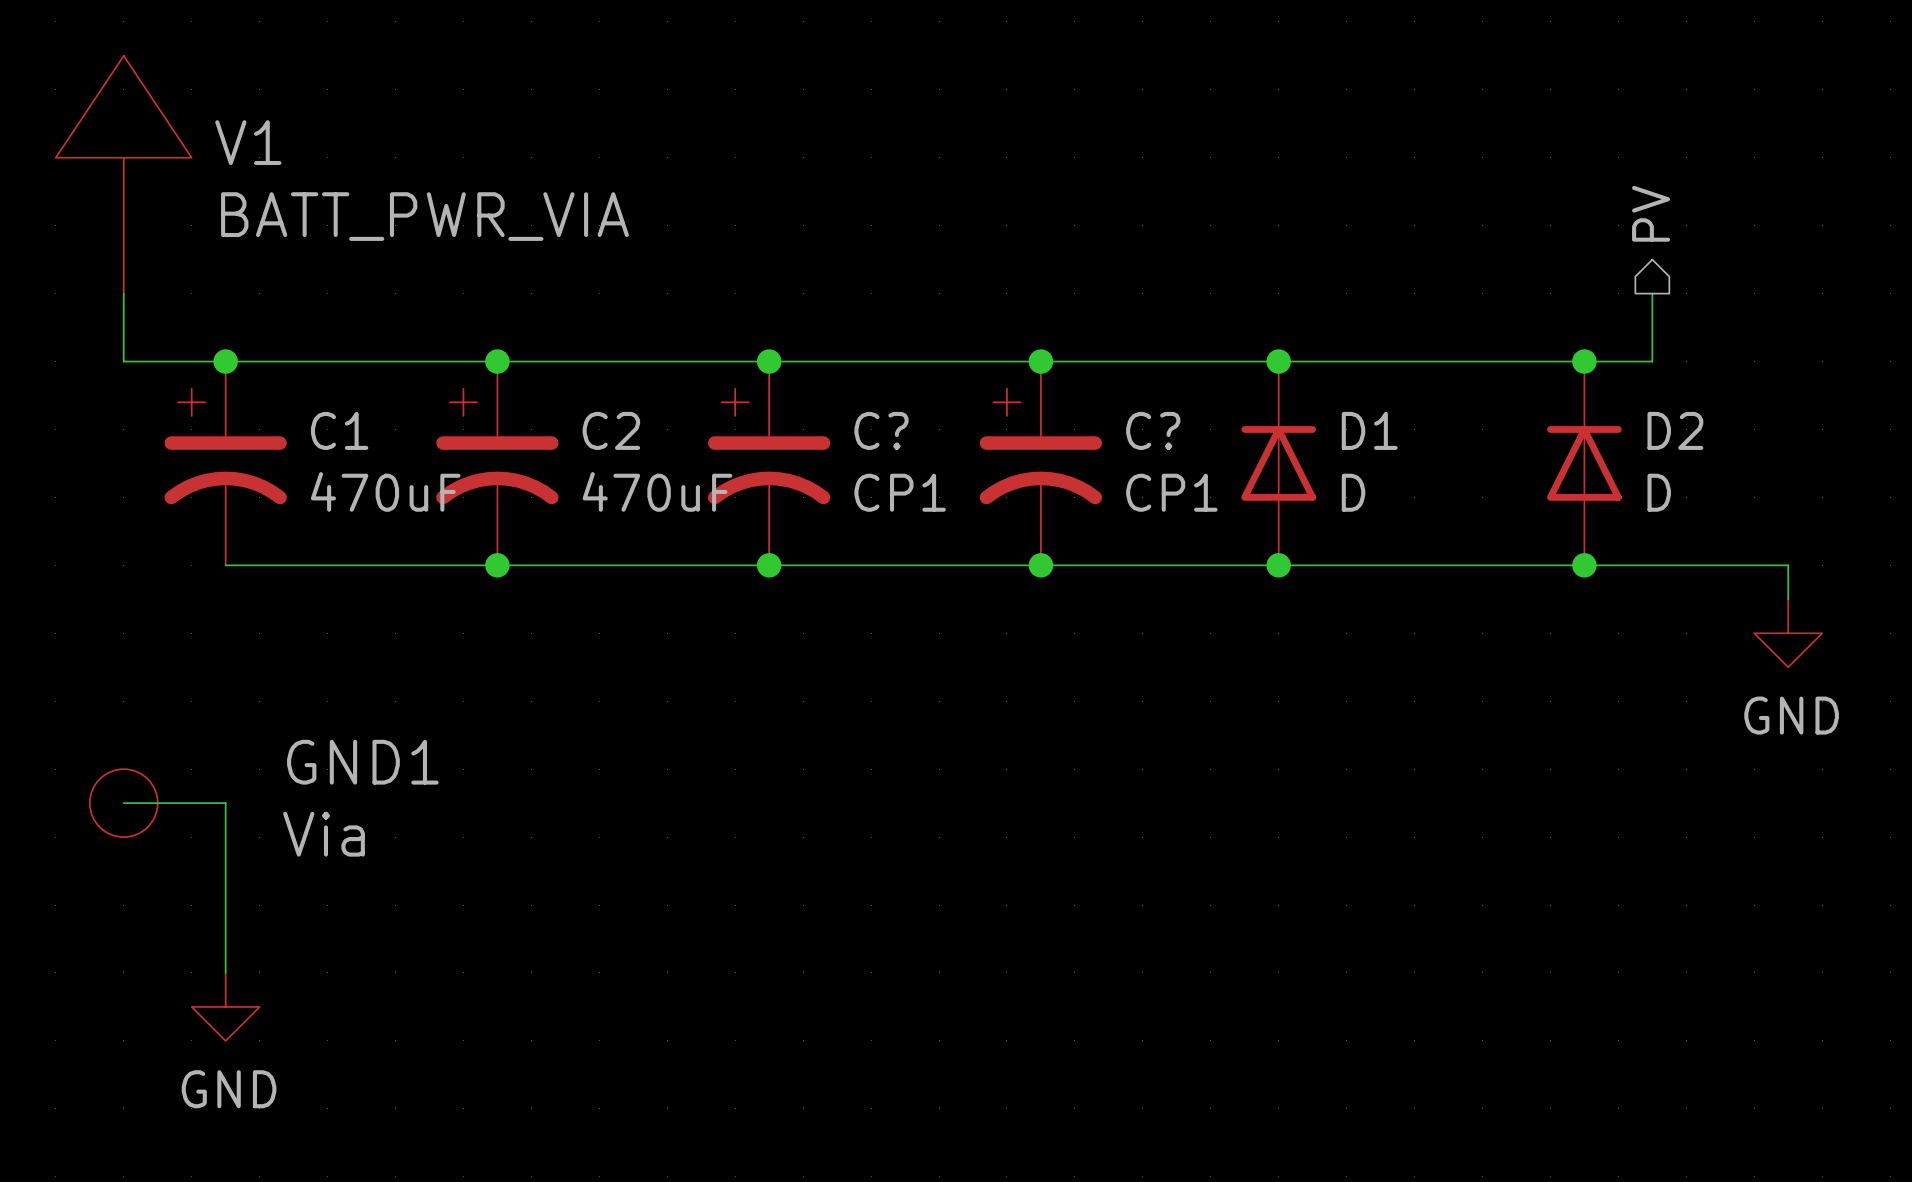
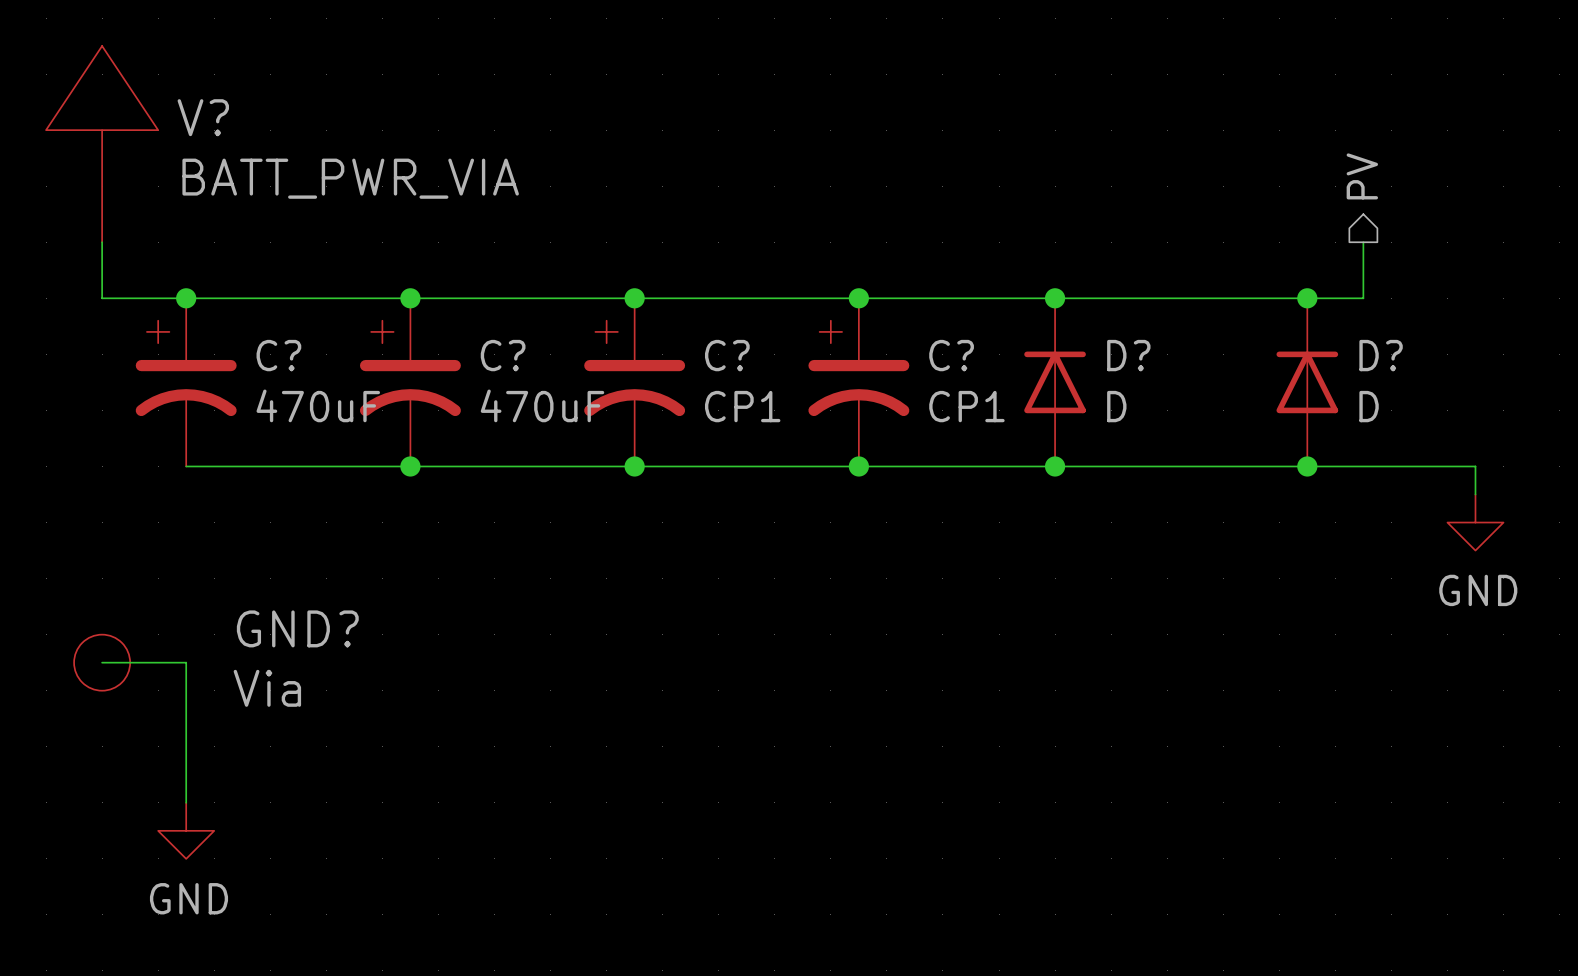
V1 name: V1 (248, 142) -> V? (203, 117)
C1 name: C1 (339, 430) -> C? (278, 355)
C2 name: C2 (611, 430) -> C? (503, 355)
D1 name: D1 (1369, 430) -> D? (1128, 355)
D2 name: D2 (1675, 430) -> D? (1381, 355)
GND1 name: GND1 (362, 762) -> GND? (297, 628)

